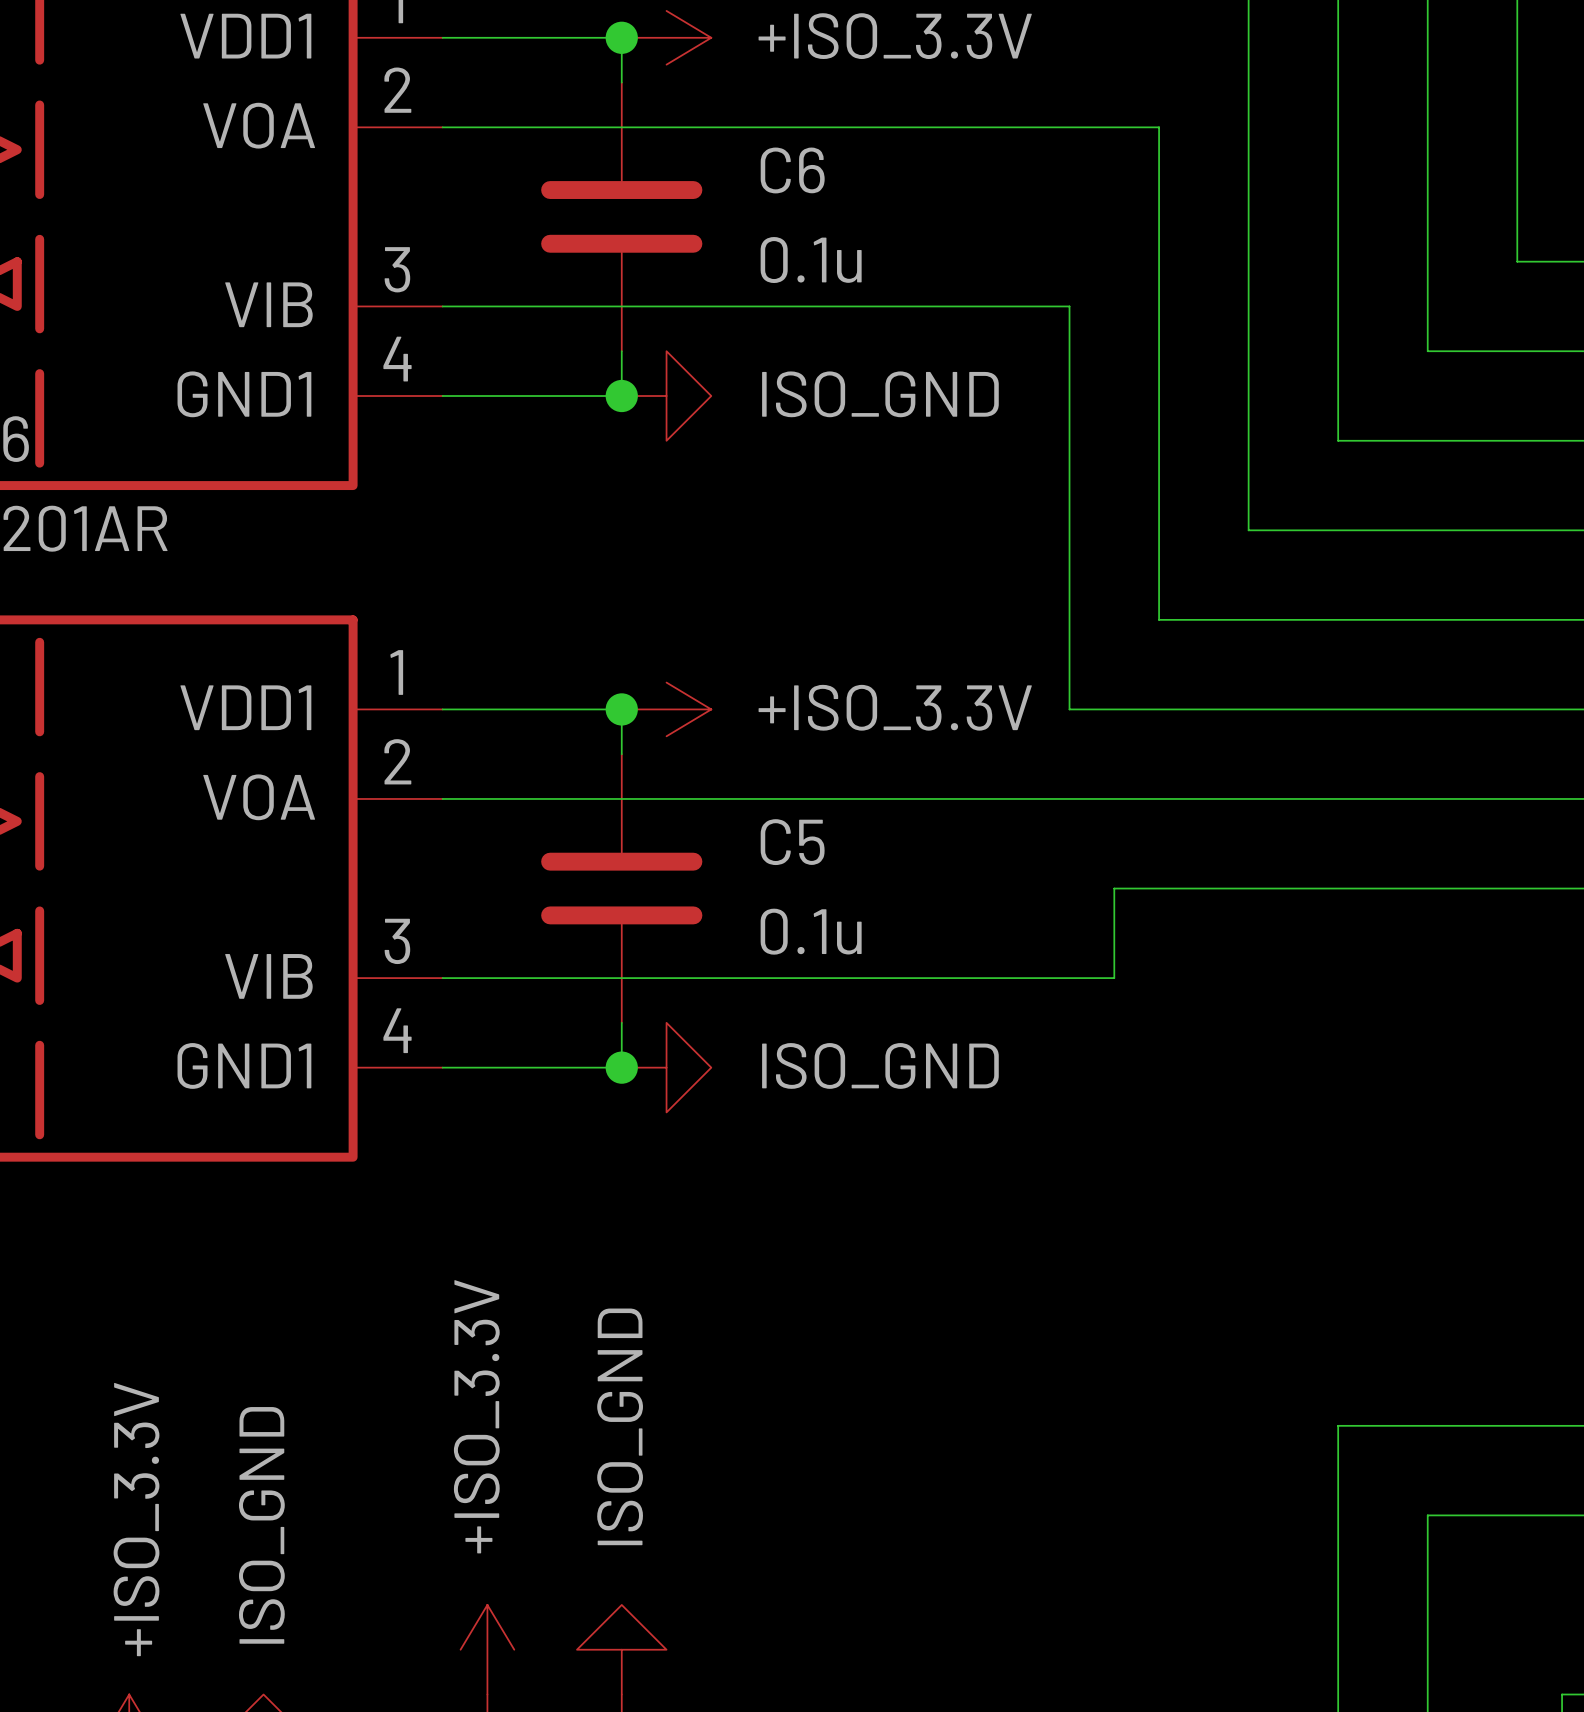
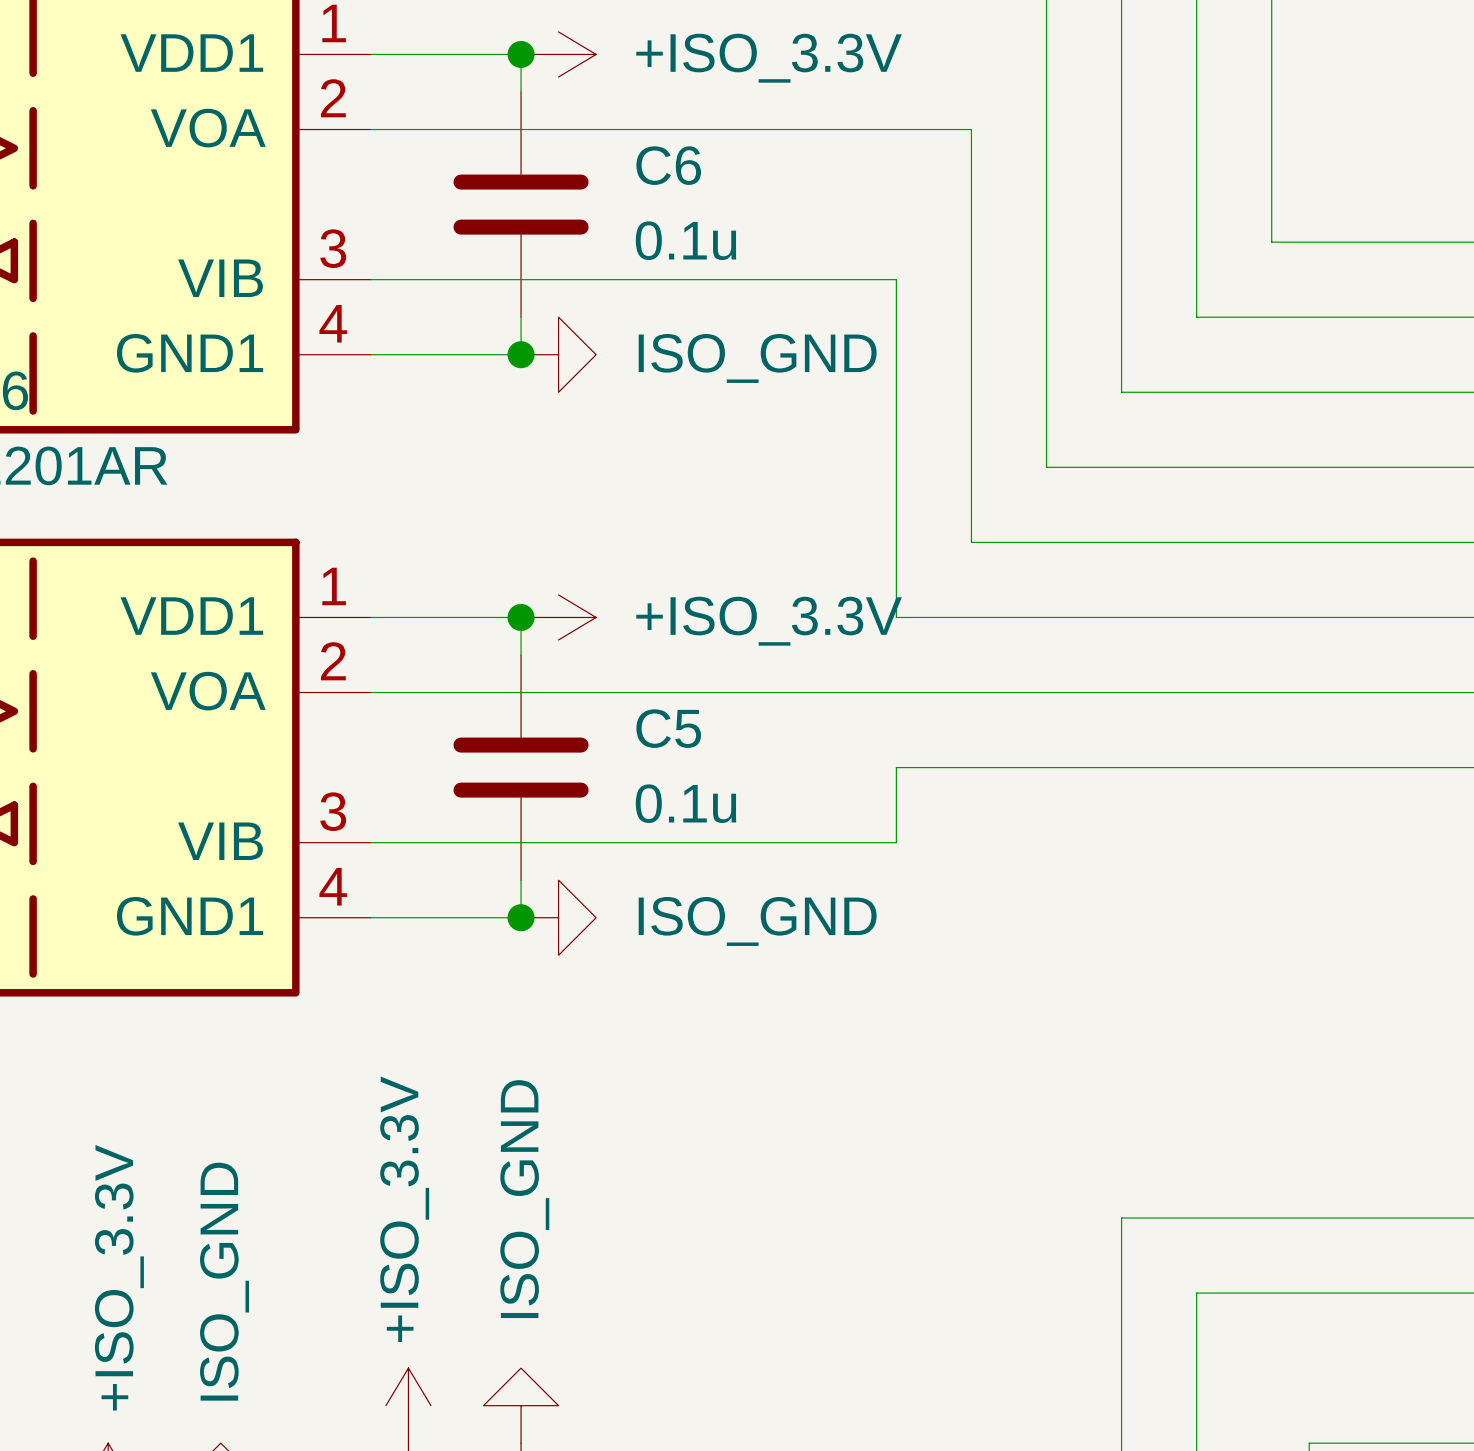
wire: (1114, 888) (1114, 978) (1069, 978) -> (933, 767) (896, 767) (896, 842)

